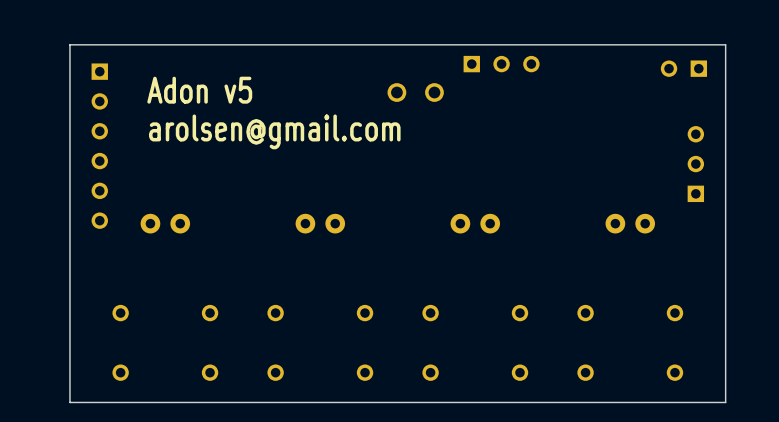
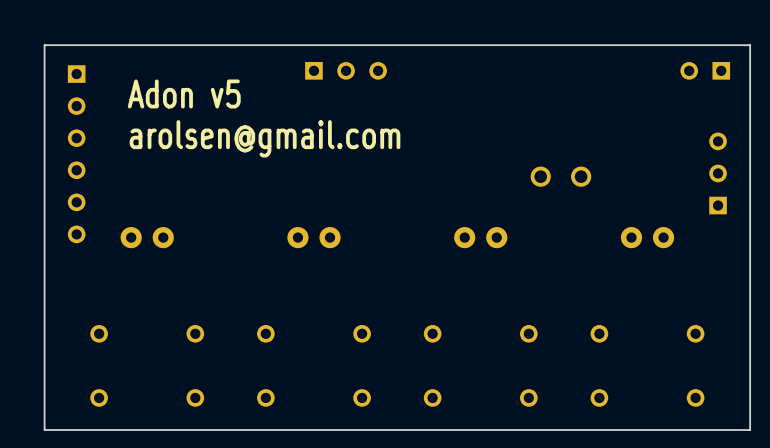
part position: (501, 64) -> (346, 70)
part position: (415, 92) -> (560, 176)

